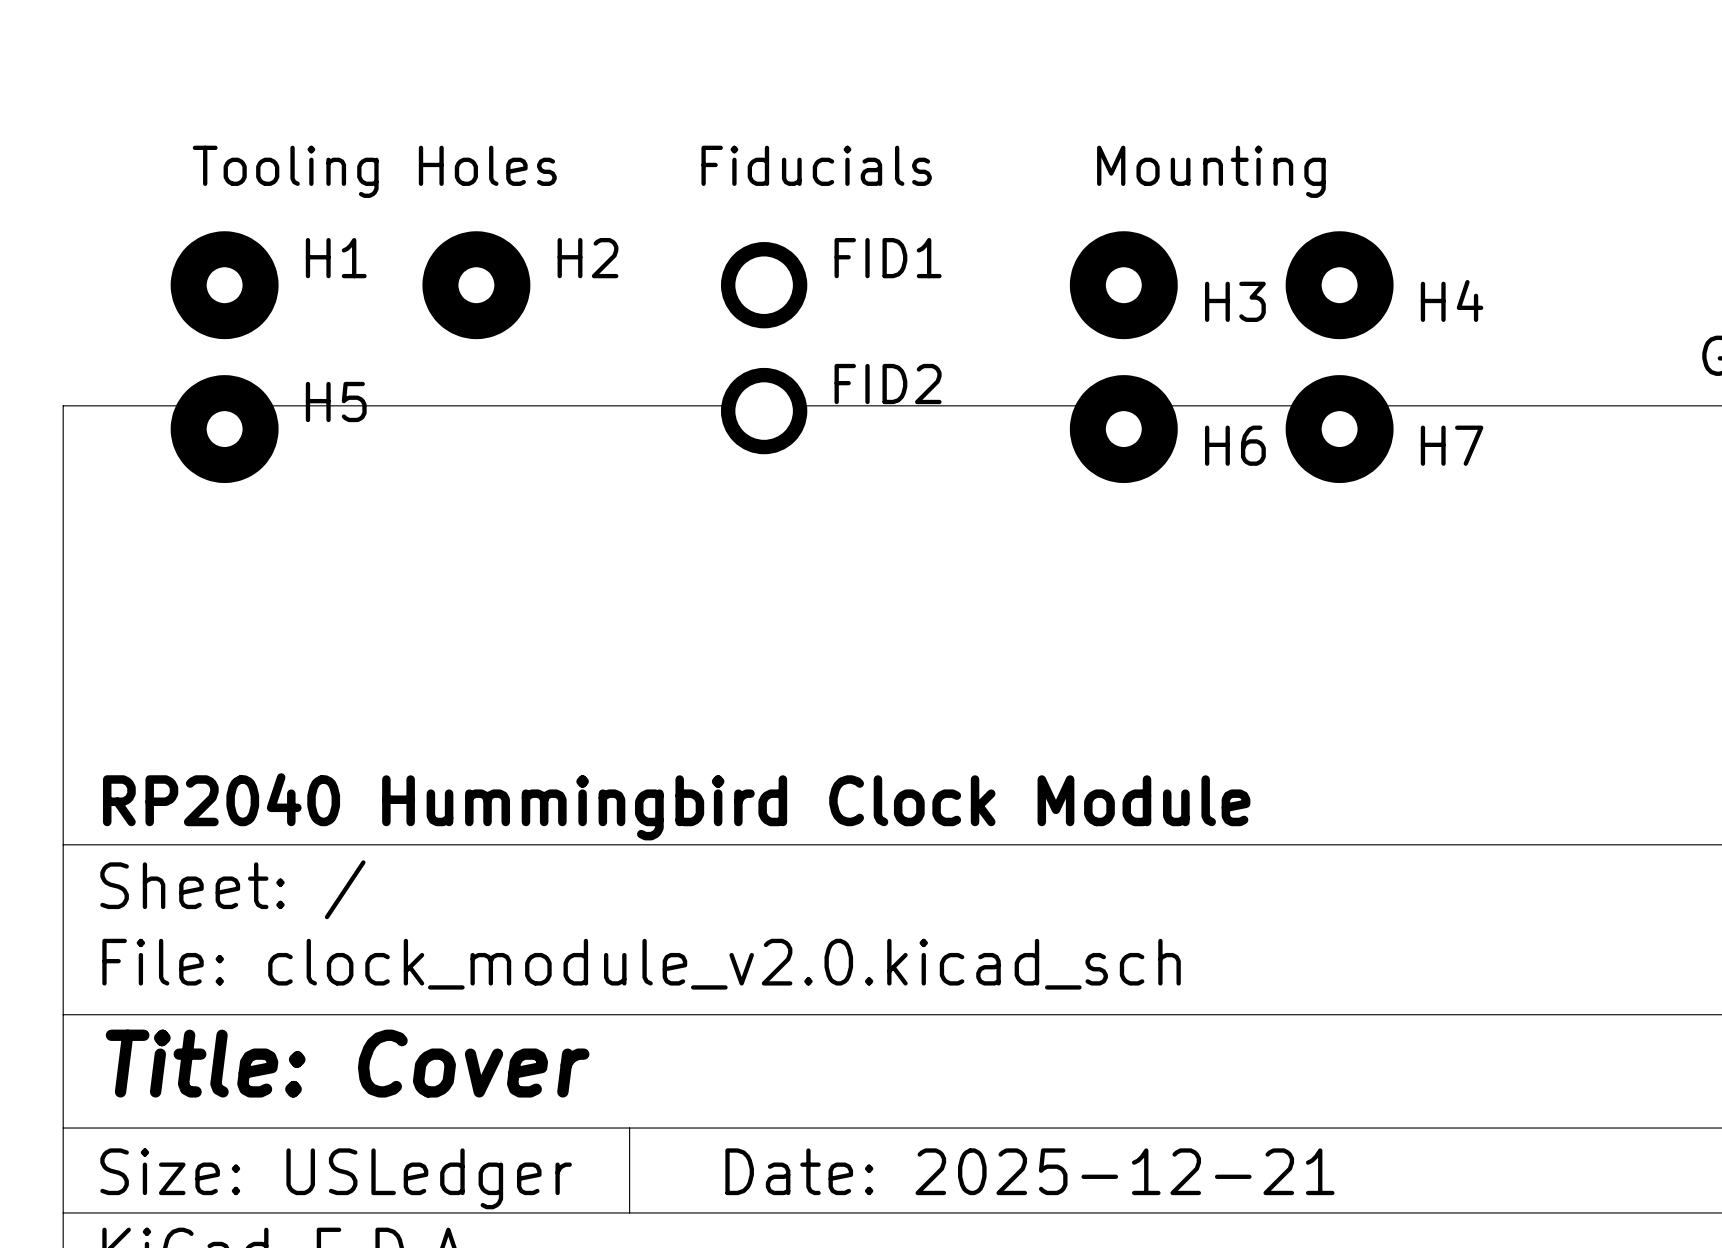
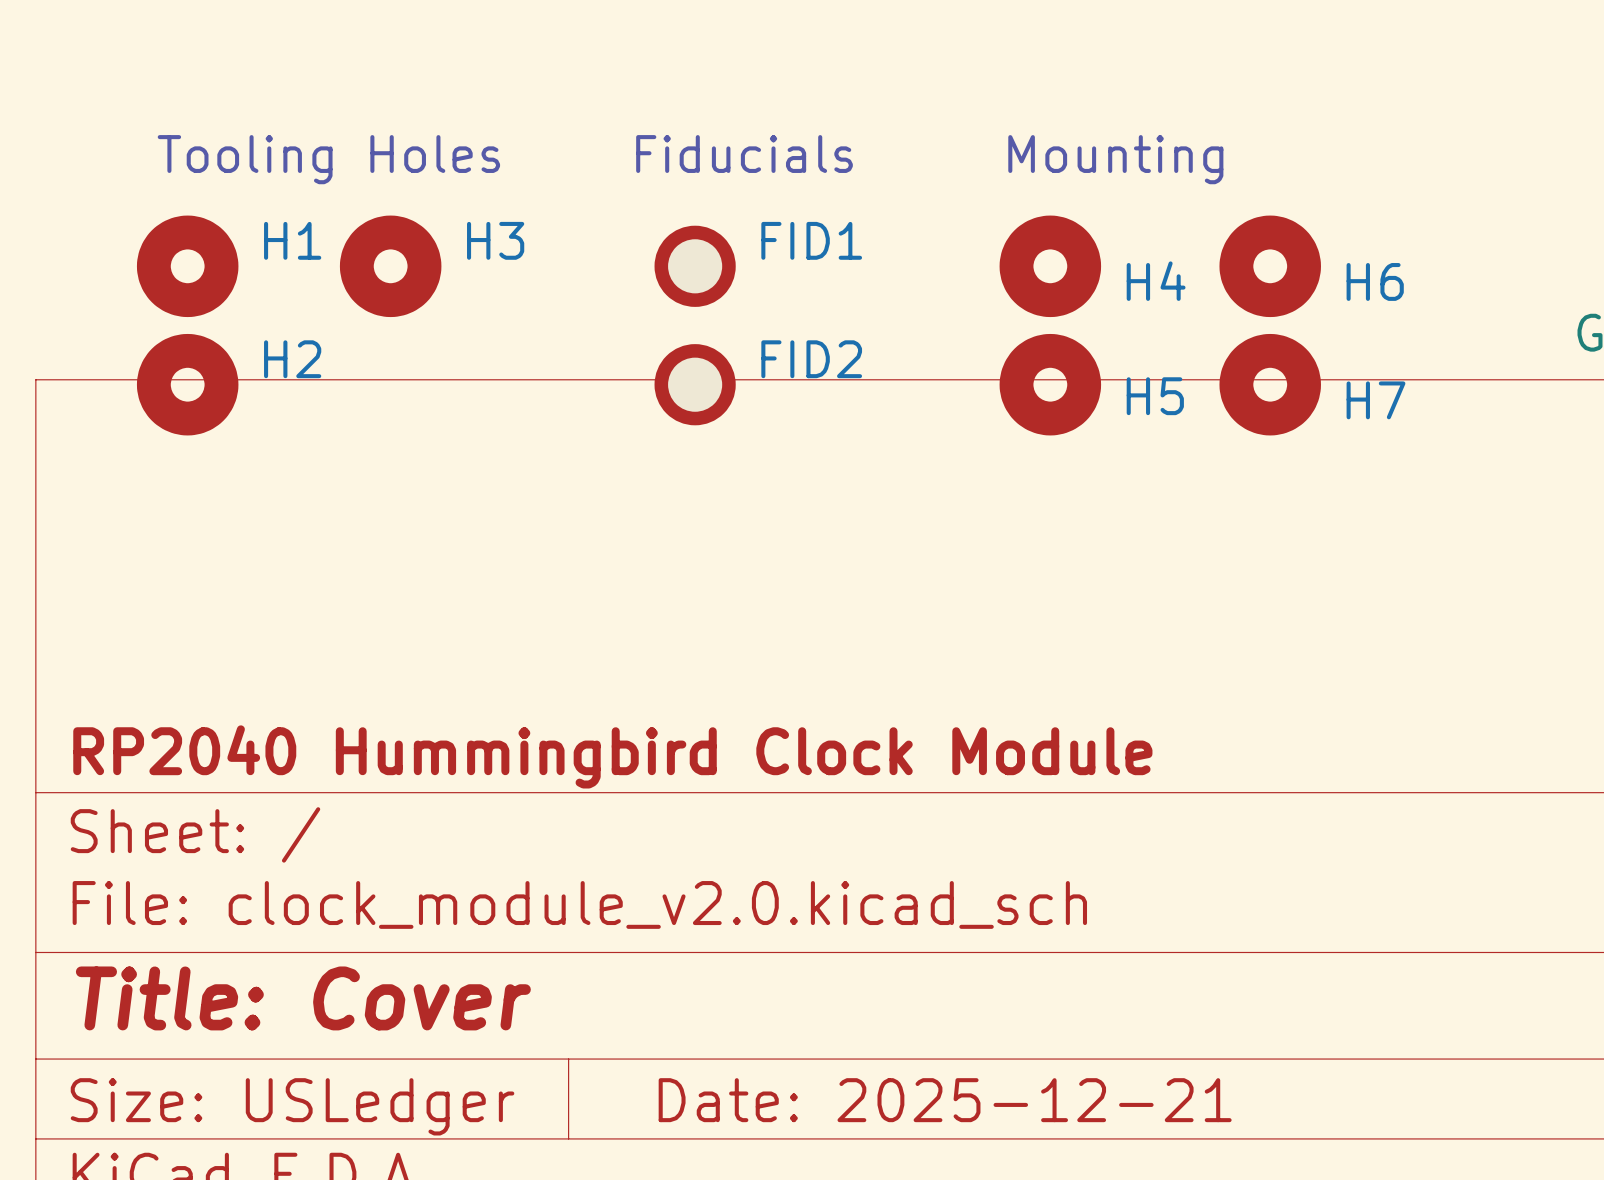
H2 position: (476, 285) -> (187, 384)
H3 position: (1123, 285) -> (390, 266)
H4 position: (1339, 285) -> (1050, 266)
H3 name position: H3 (1235, 301) -> H3 (495, 240)
H5 name position: H5 (336, 401) -> H5 (1155, 396)
H5 position: (224, 429) -> (1050, 384)
H6 position: (1123, 429) -> (1270, 266)
H7 position: (1339, 429) -> (1270, 384)

